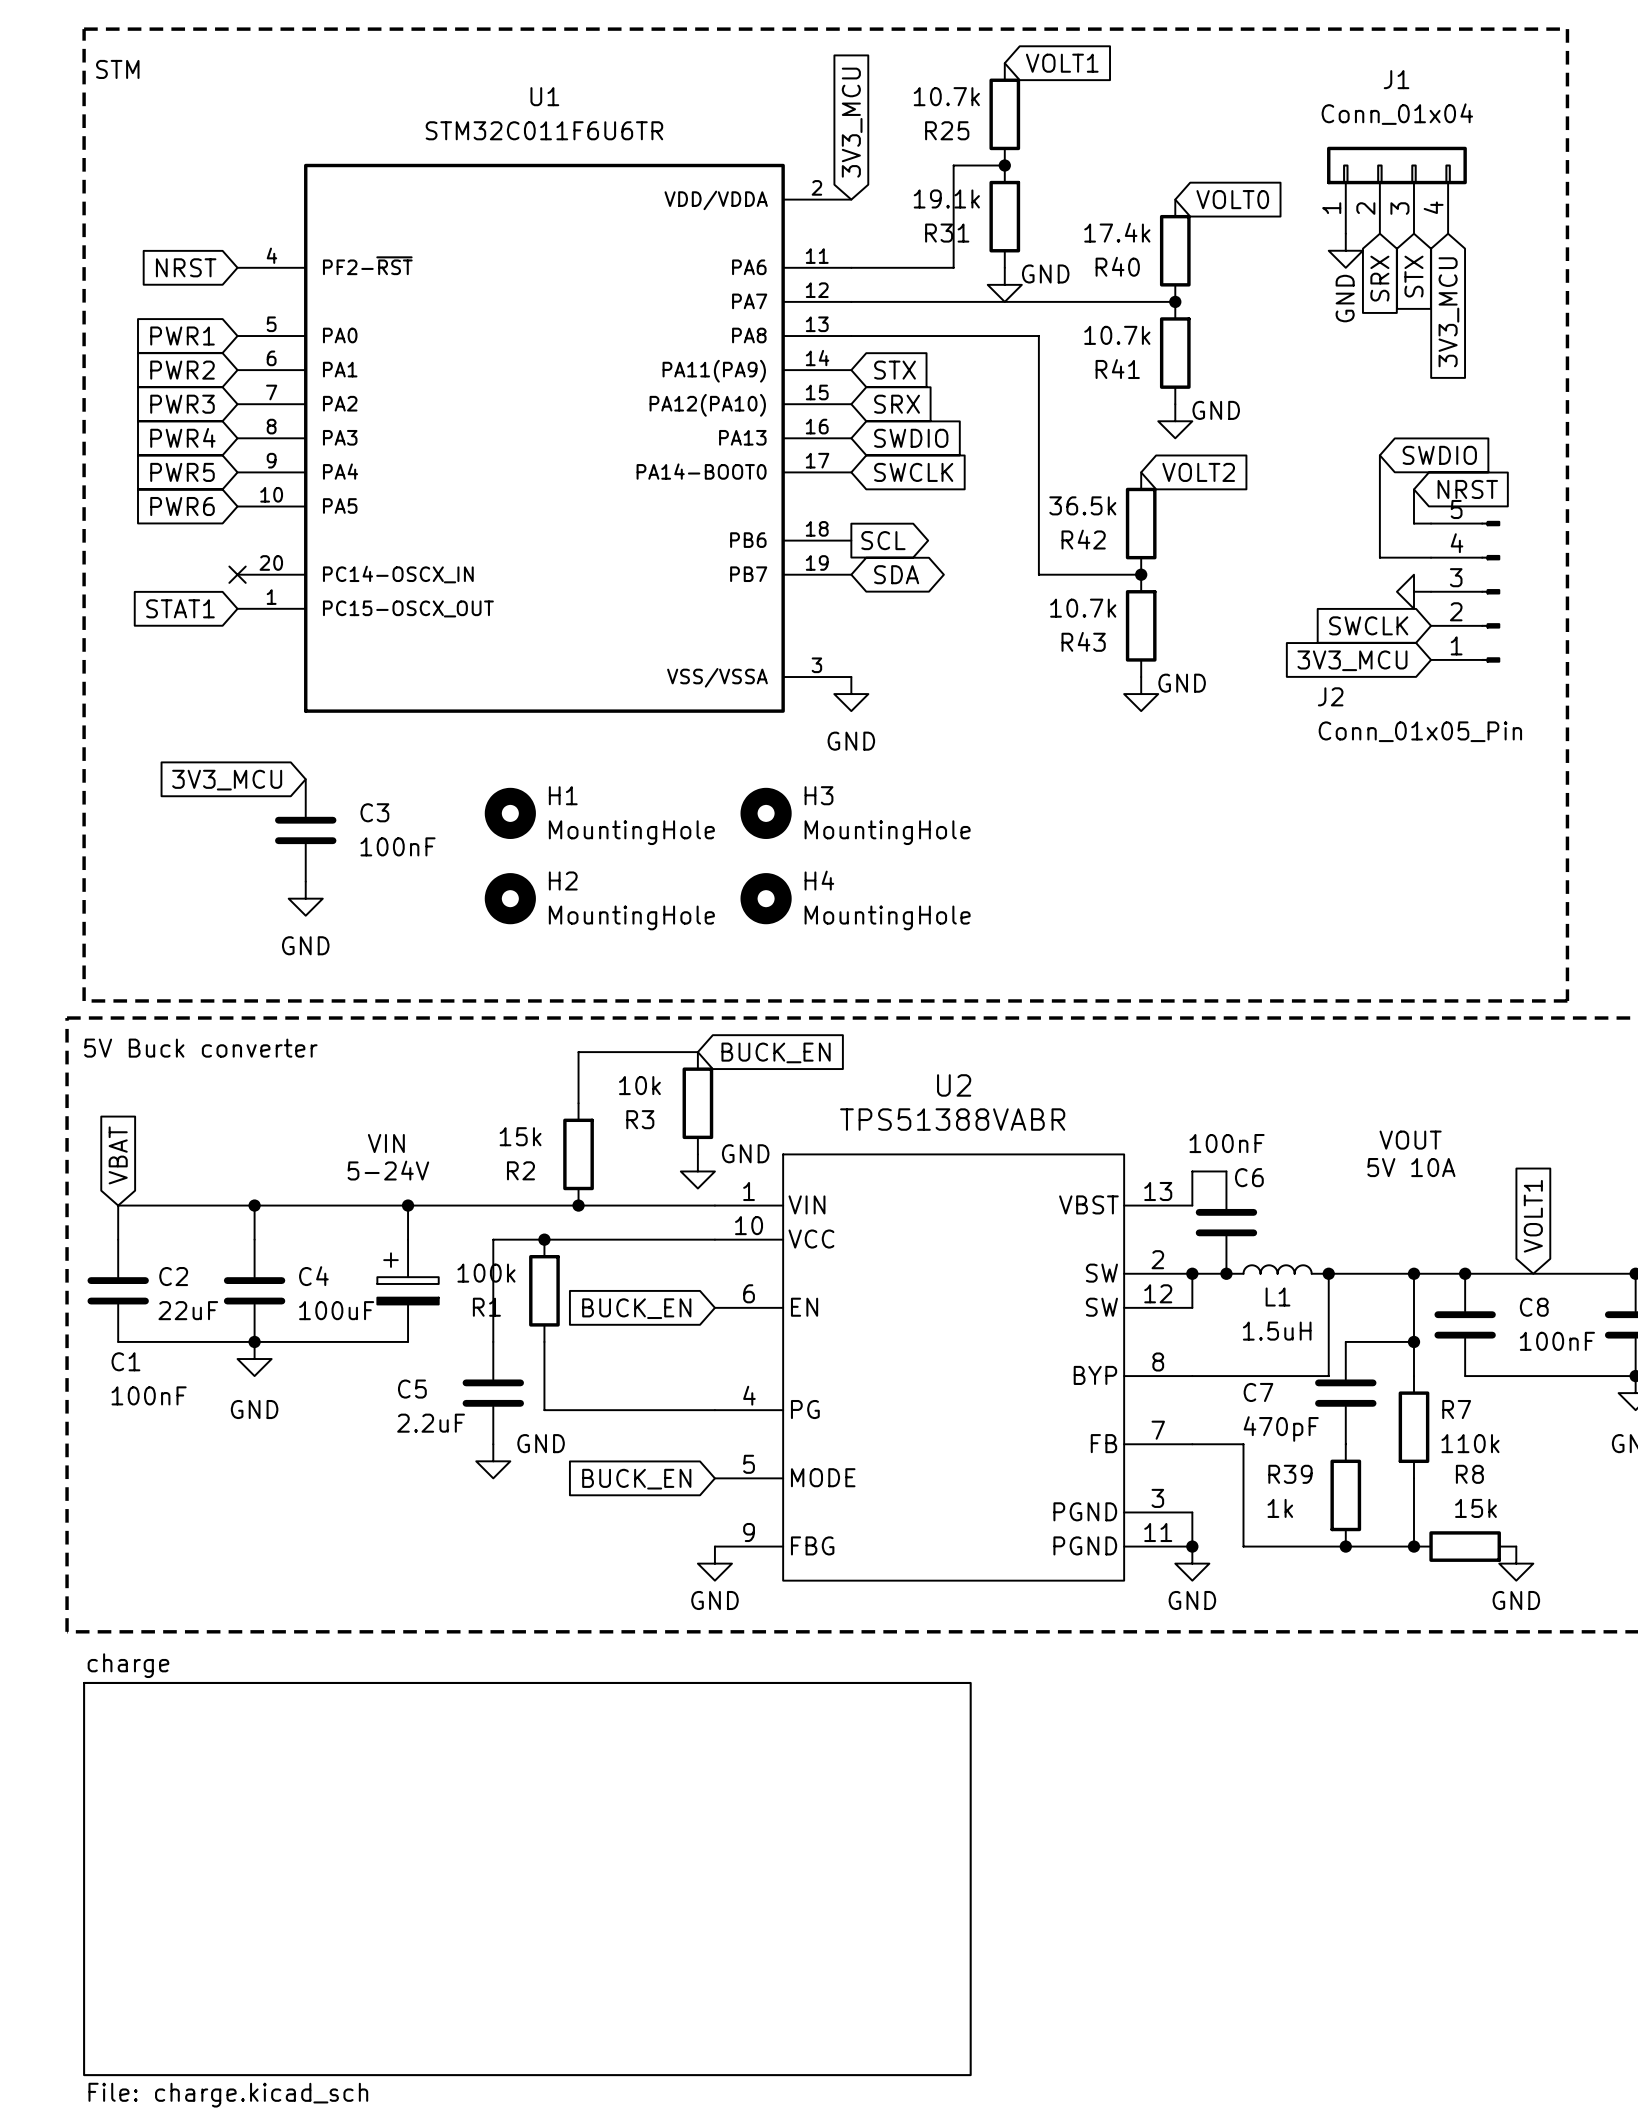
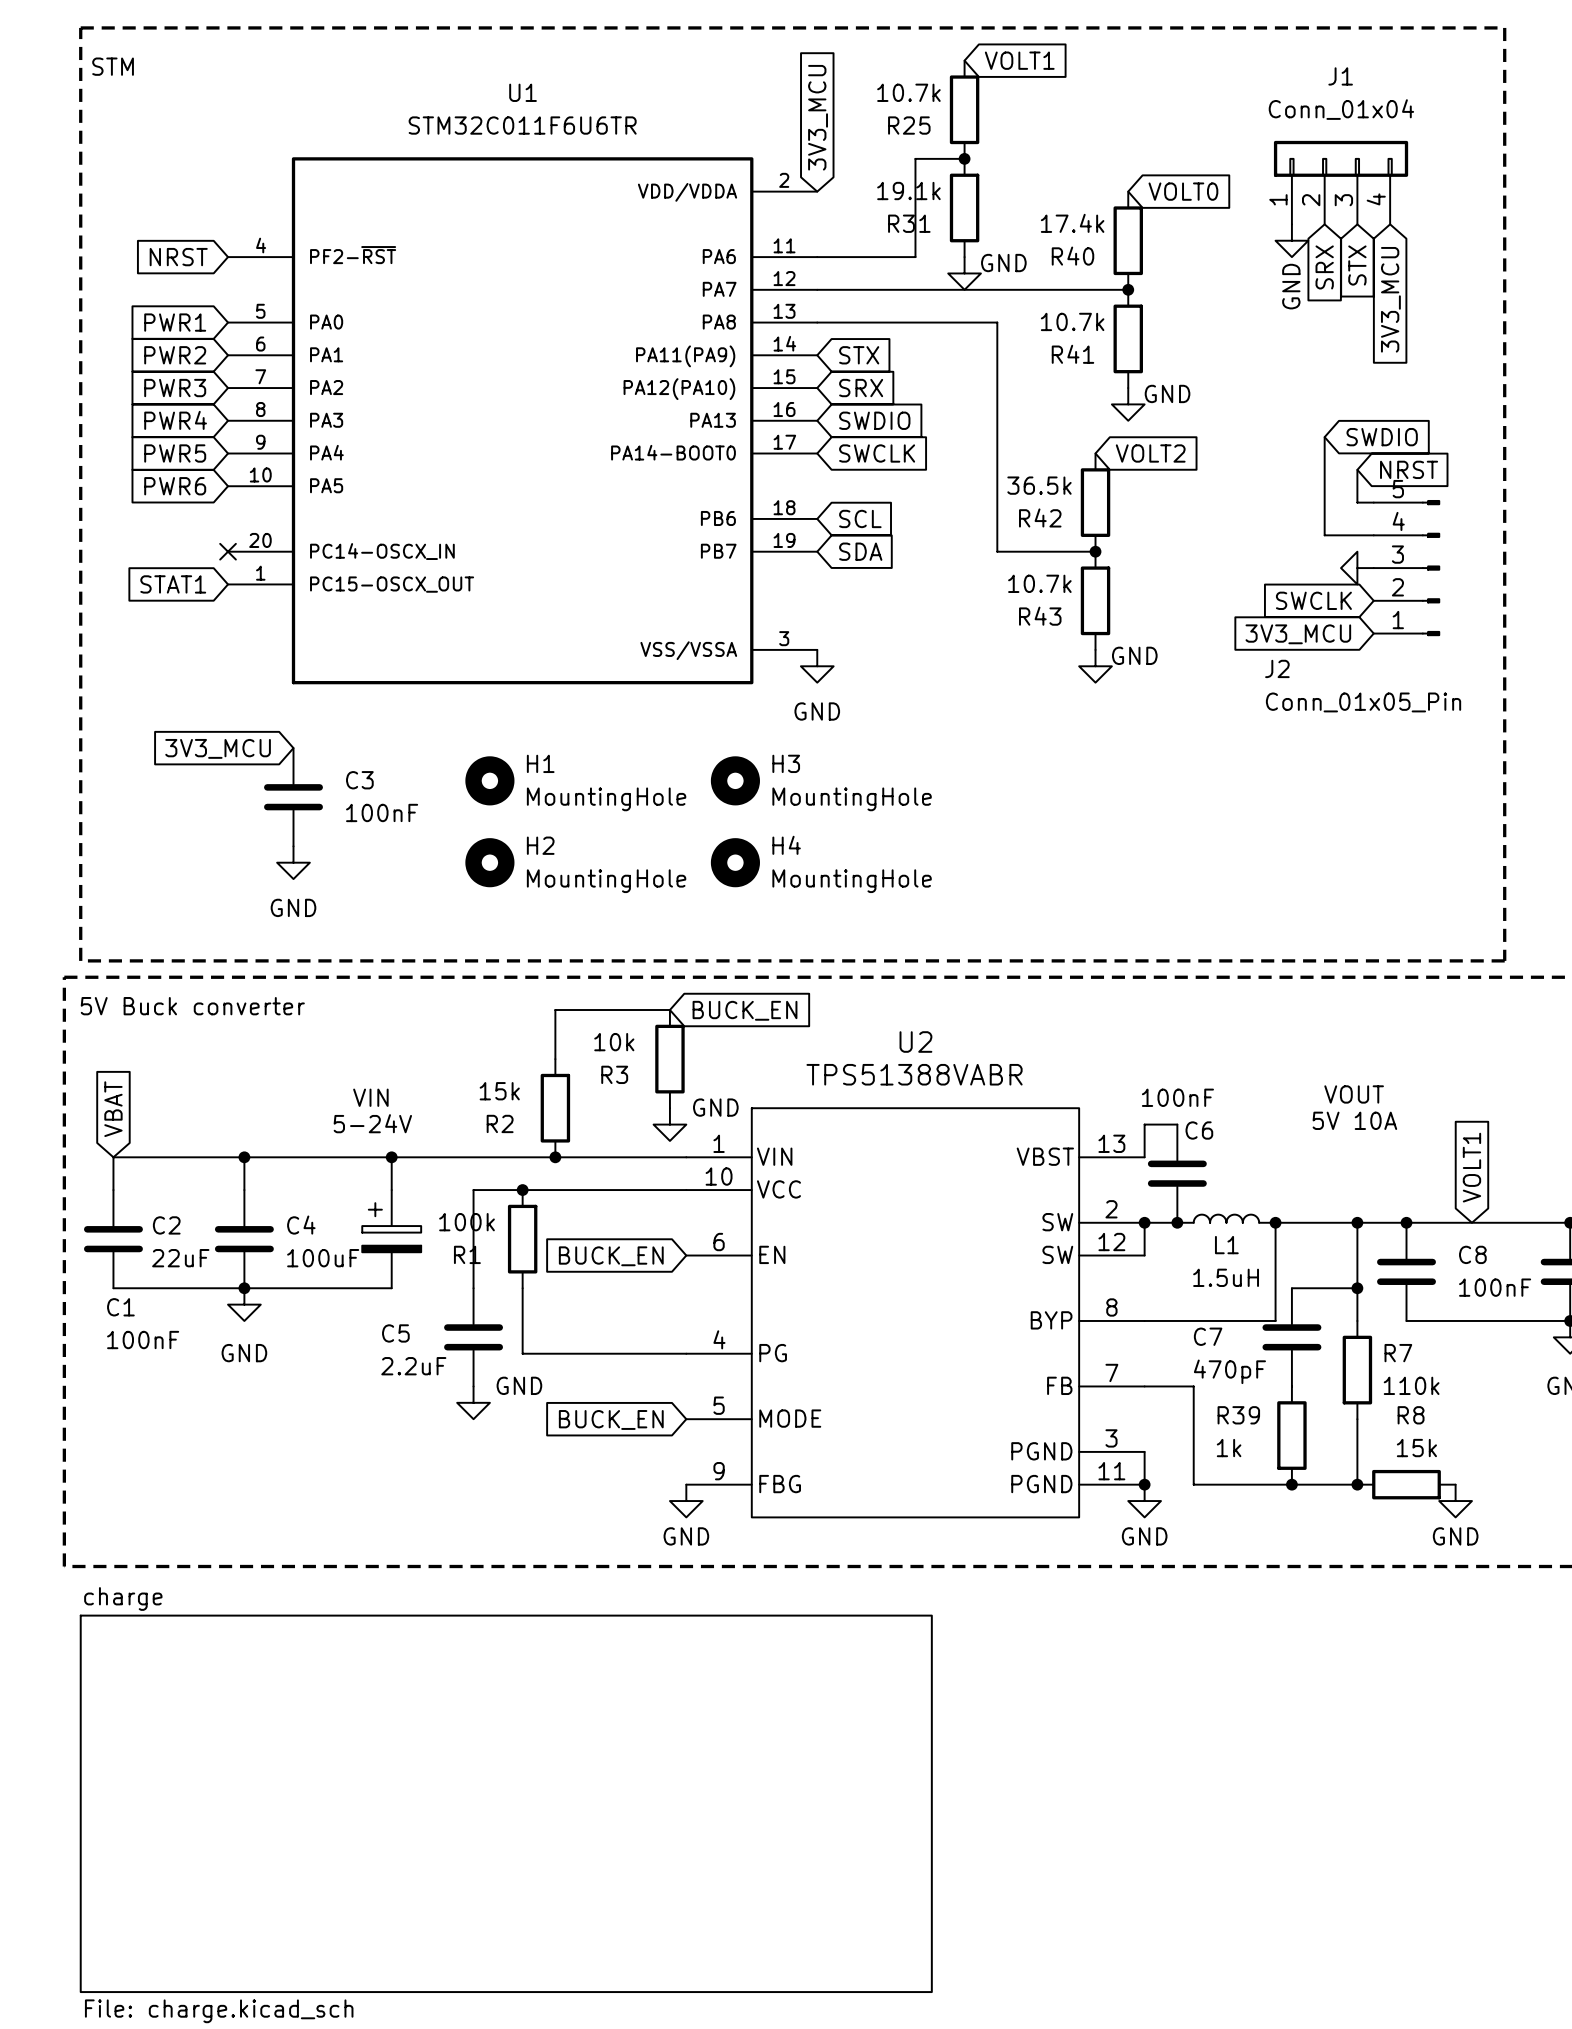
global label shape: output (883, 540) -> input (860, 518)
global label shape: bidirectional (896, 574) -> input (860, 551)

